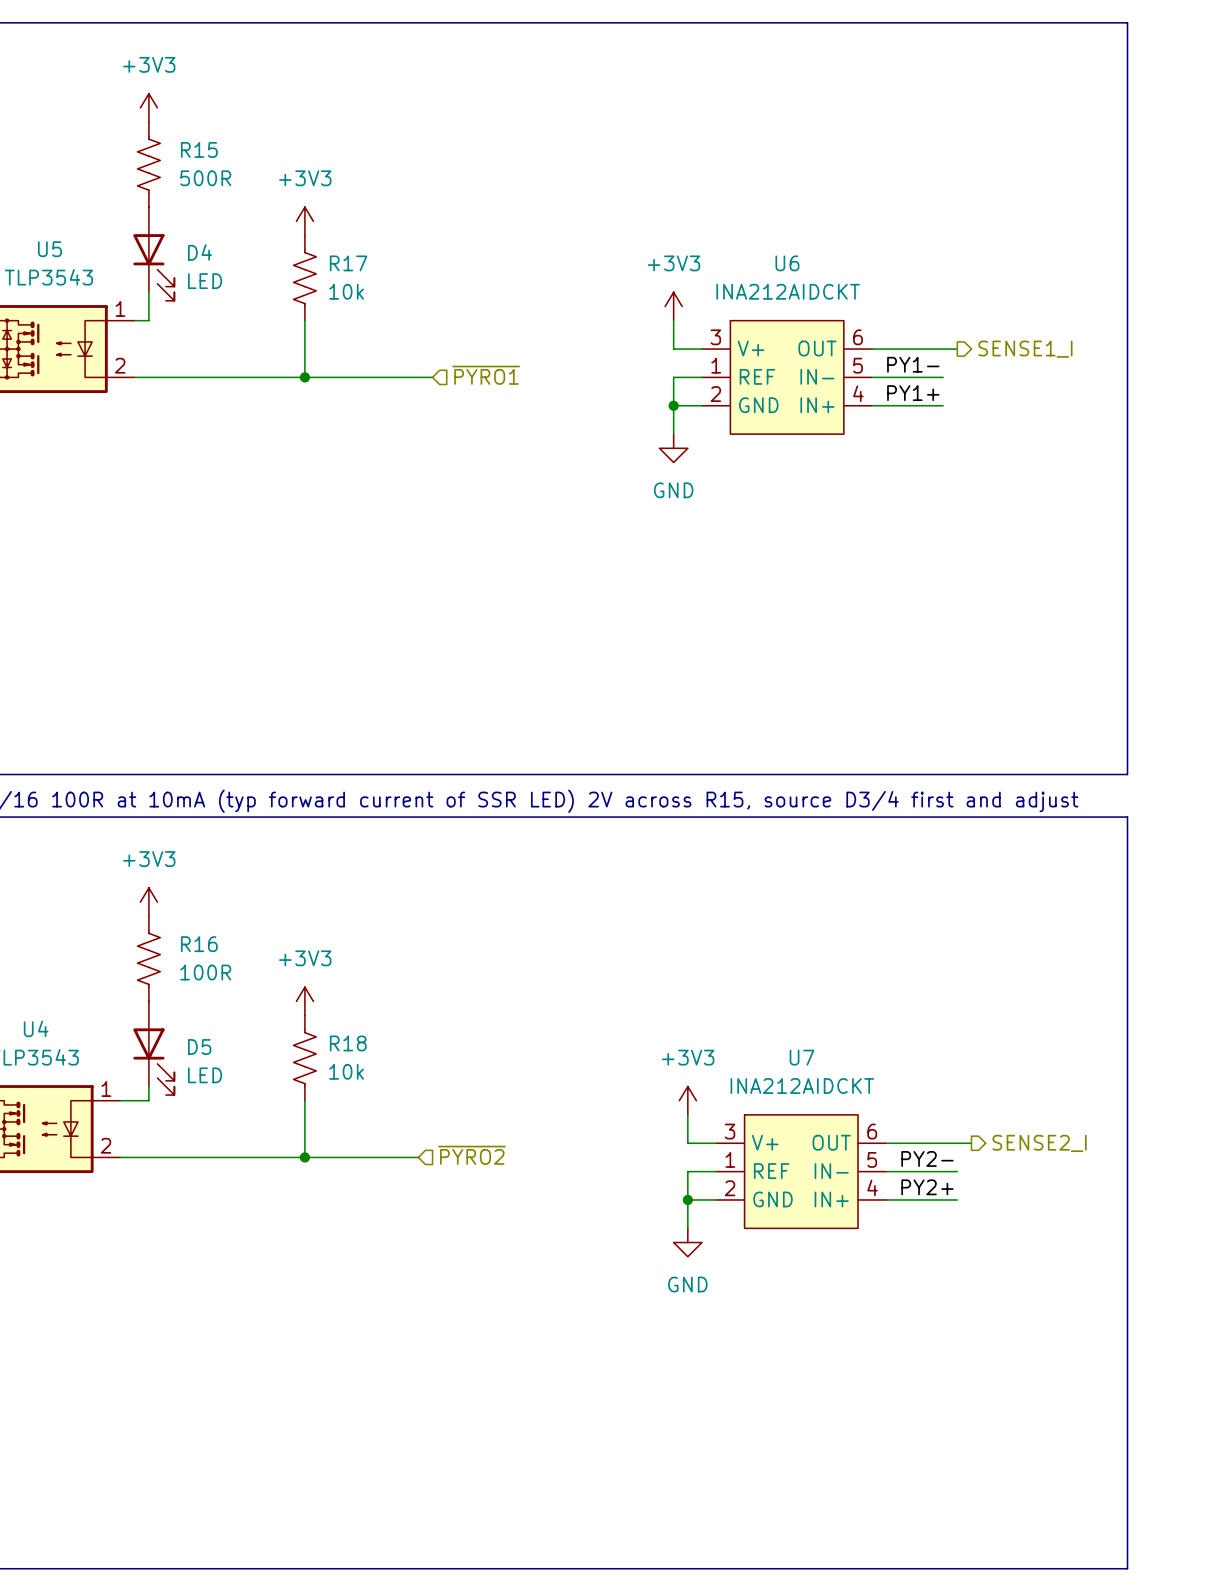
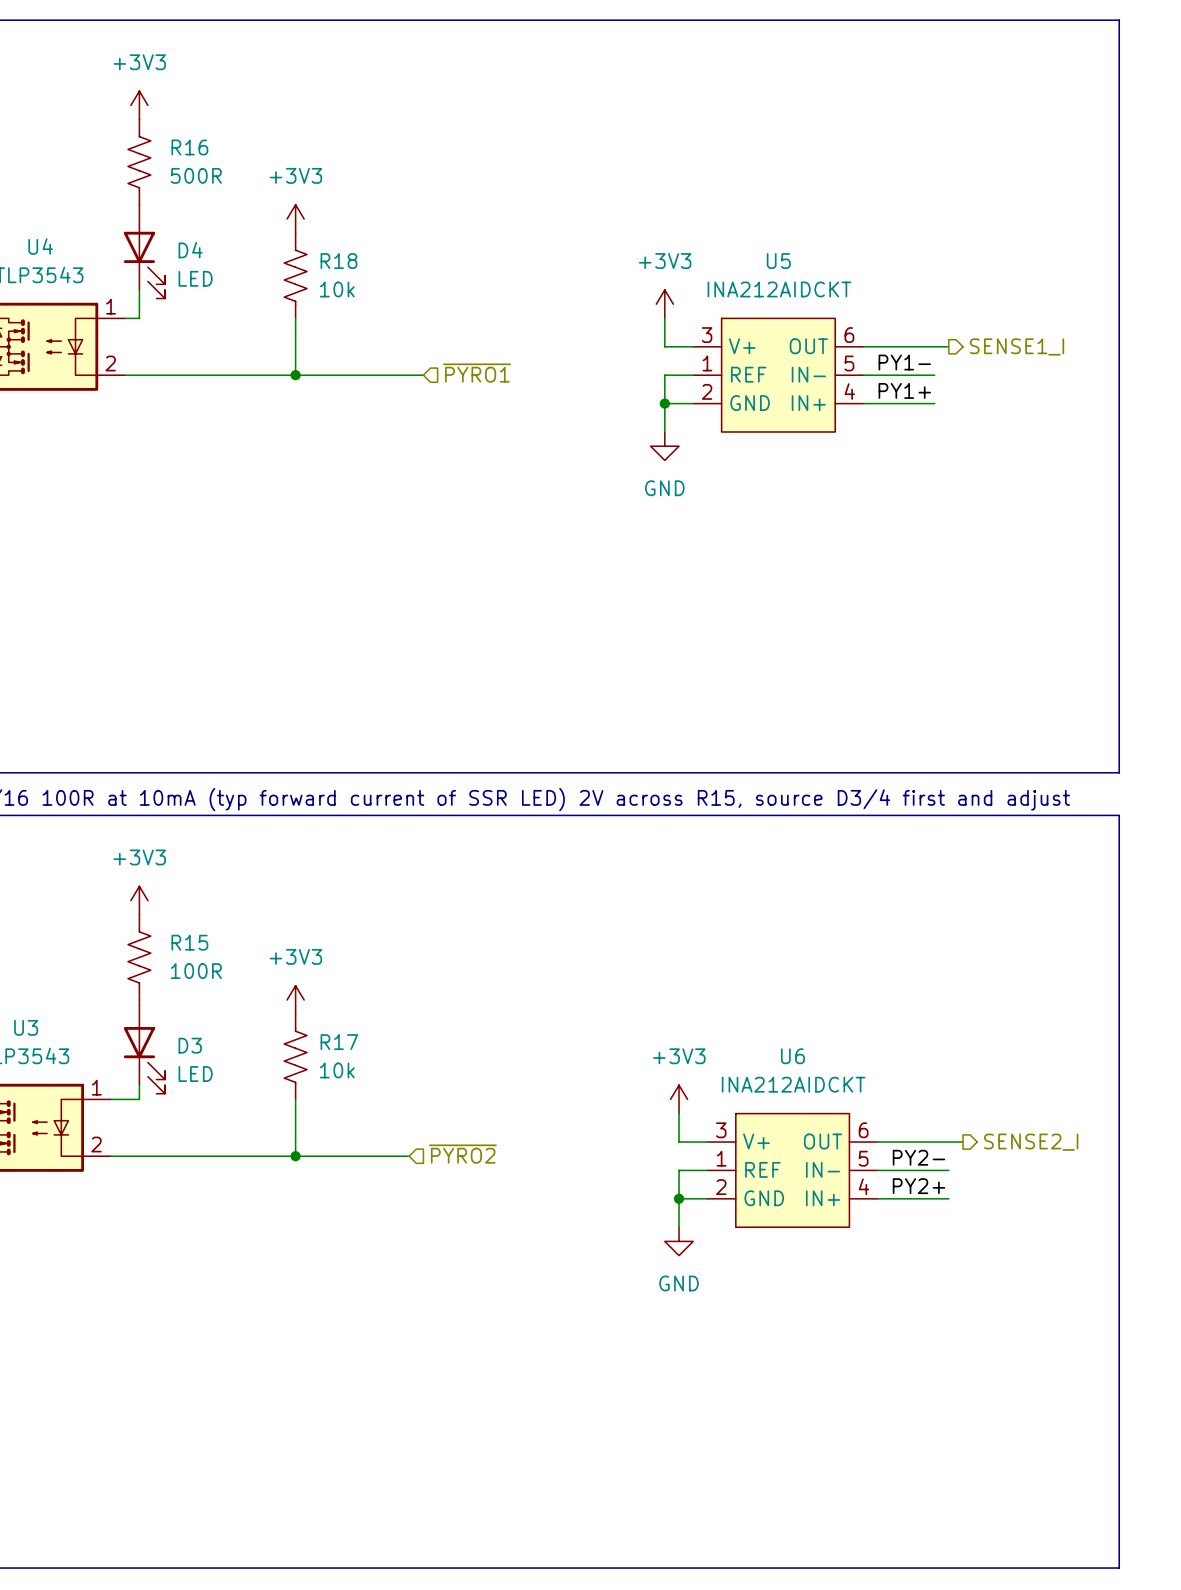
R15 name: R15 (199, 149) -> R16 (189, 147)
U5 name: U5 (49, 249) -> U4 (40, 246)
R17 name: R17 (348, 263) -> R18 (338, 261)
U6 name: U6 (787, 263) -> U5 (778, 261)
R16 name: R16 (199, 944) -> R15 (189, 942)
U4 name: U4 (36, 1028) -> U3 (26, 1027)
R18 name: R18 (348, 1043) -> R17 (339, 1042)
D5 name: D5 (199, 1046) -> D3 (190, 1045)
U7 name: U7 (801, 1057) -> U6 (792, 1056)

